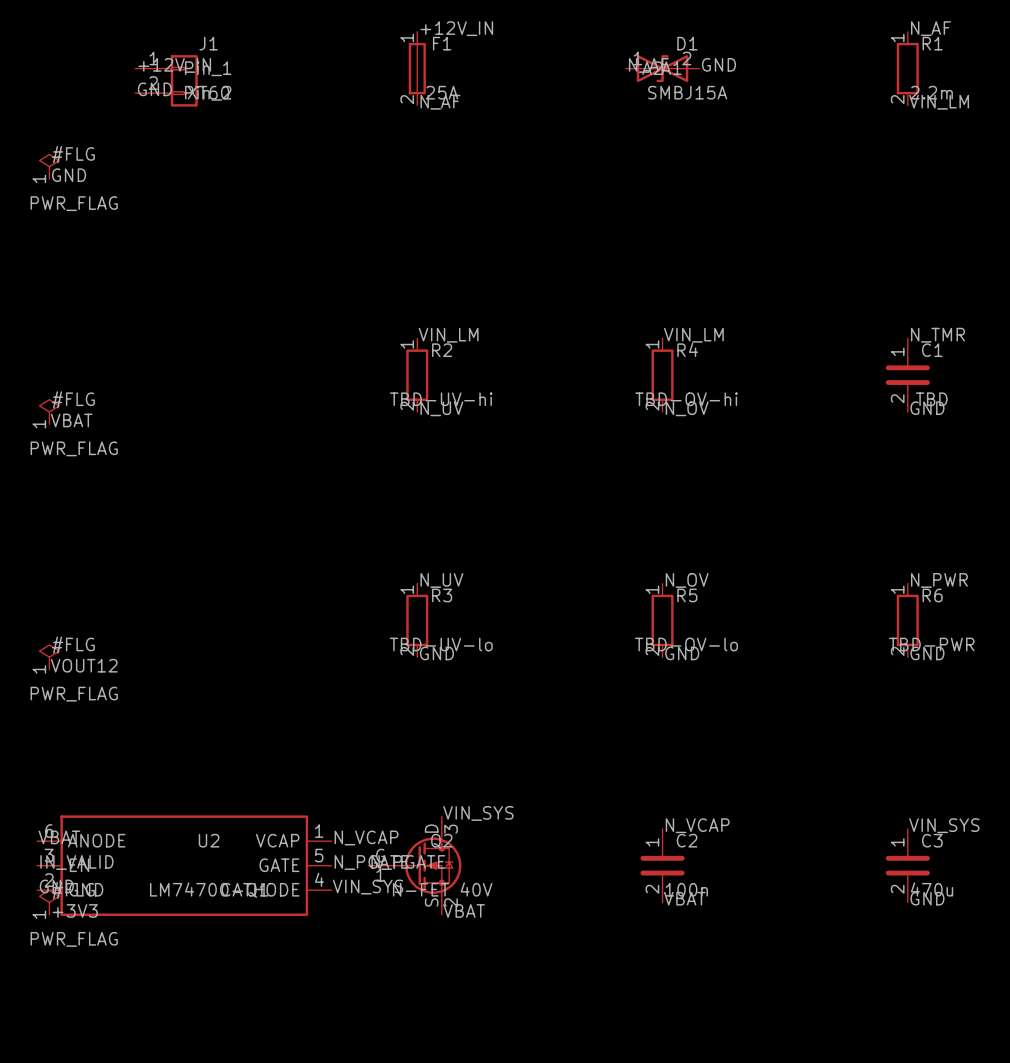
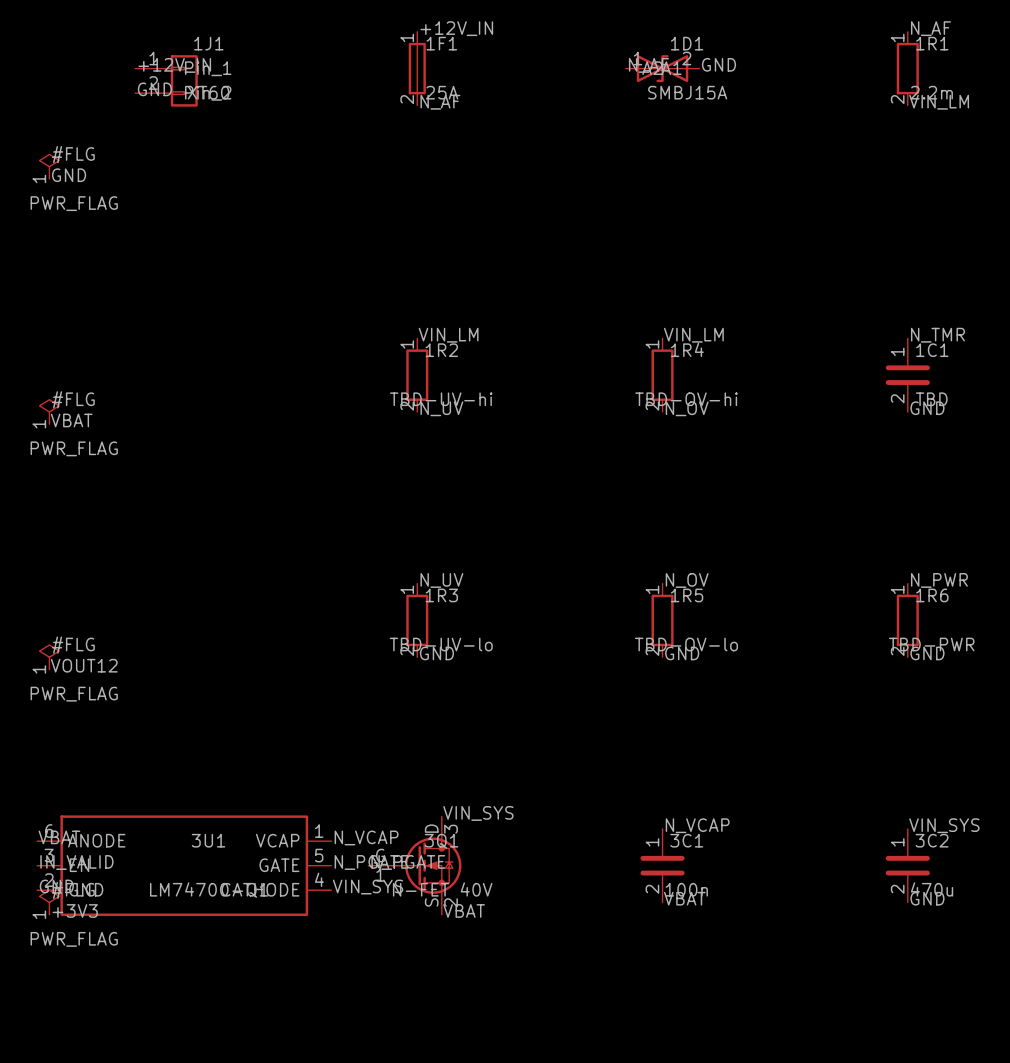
J1 name: J1 (208, 43) -> 1J1 (208, 43)
F1 name: F1 (442, 43) -> 1F1 (441, 43)
D1 name: D1 (687, 43) -> 1D1 (687, 43)
R1 name: R1 (932, 43) -> 1R1 (932, 43)
R4 name: R4 (687, 349) -> 1R4 (687, 349)
R2 name: R2 (442, 350) -> 1R2 (441, 350)
C1 name: C1 (932, 350) -> 1C1 (932, 350)
R3 name: R3 (442, 595) -> 1R3 (441, 595)
R5 name: R5 (687, 595) -> 1R5 (687, 595)
R6 name: R6 (932, 595) -> 1R6 (932, 595)
U2 name: U2 (209, 840) -> 3U1 (208, 840)
C2 name: C2 (687, 840) -> 3C1 (686, 840)
C3 name: C3 (932, 840) -> 3C2 (932, 840)
Q2 name: Q2 (441, 841) -> 3Q1 (441, 841)

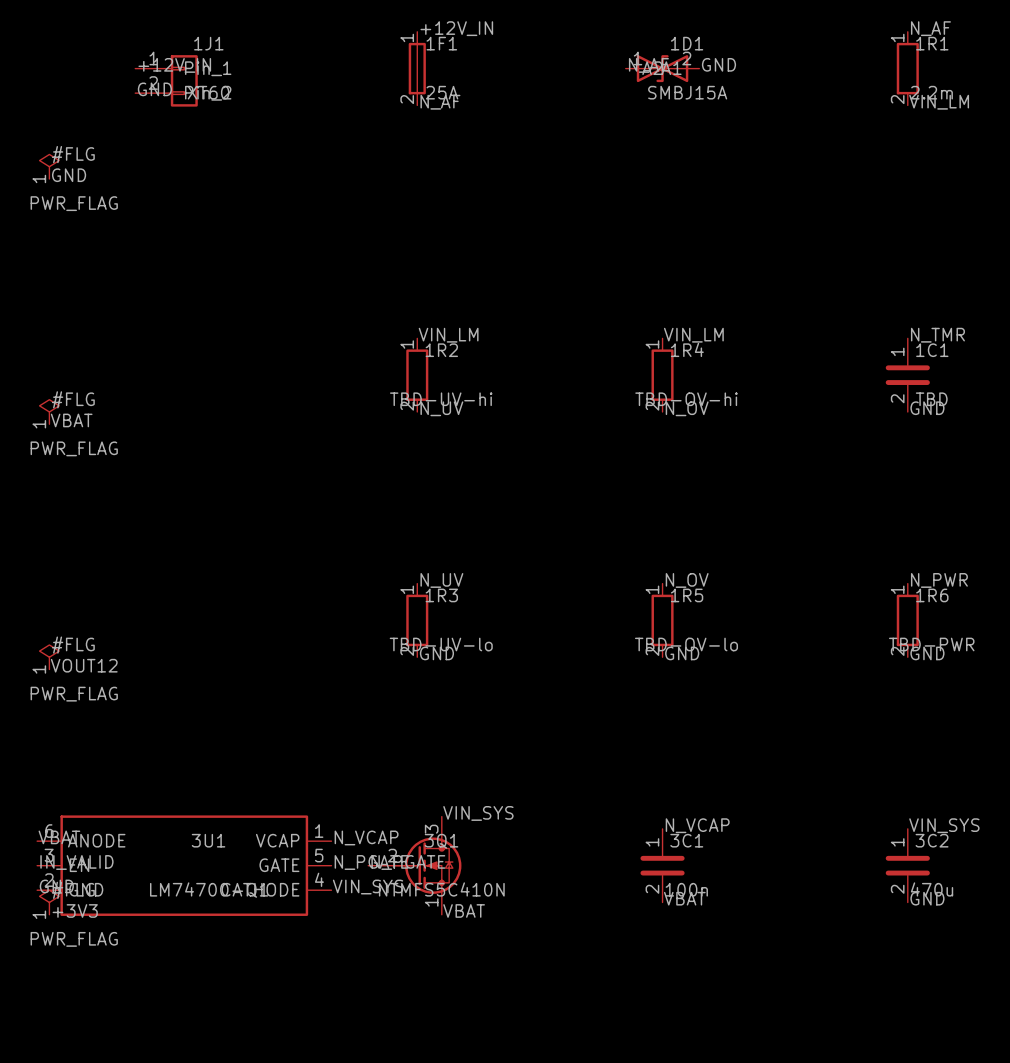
3Q1 symbol: [368, 816, 462, 915] -> [368, 816, 462, 915]
3Q1 value: N-FET 40V (442, 889) -> NTMFS5C410N (441, 889)

